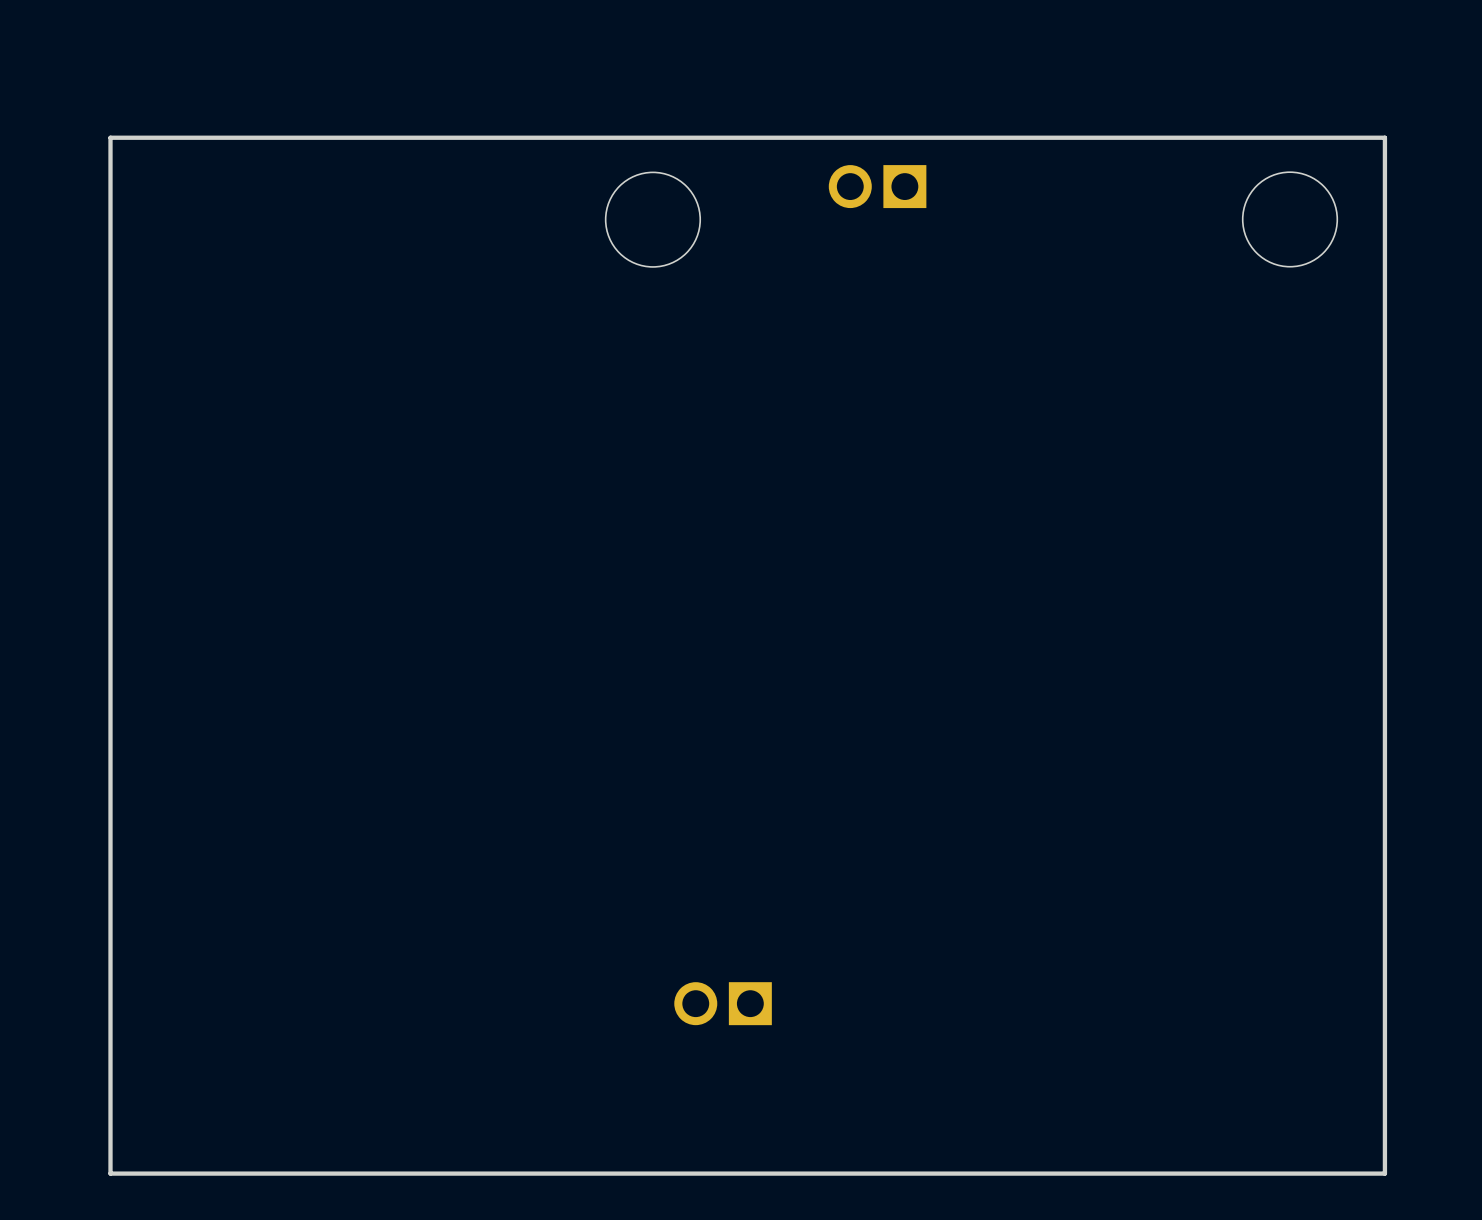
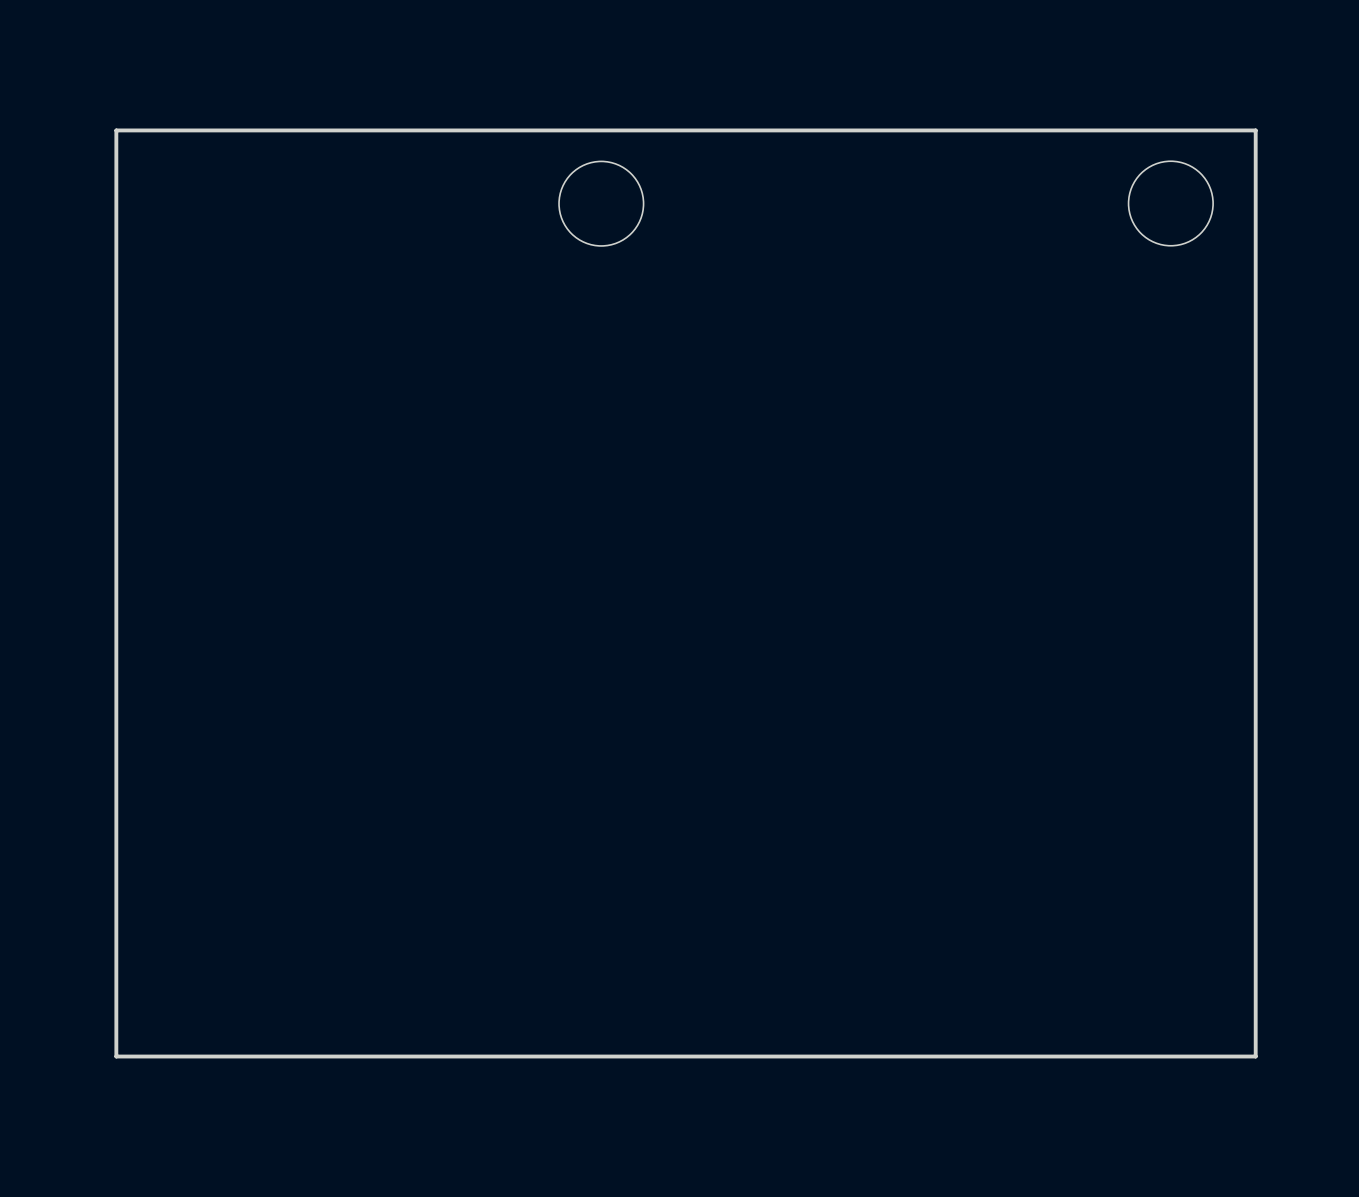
part: (877, 186) -> none
part: (723, 1003) -> none

